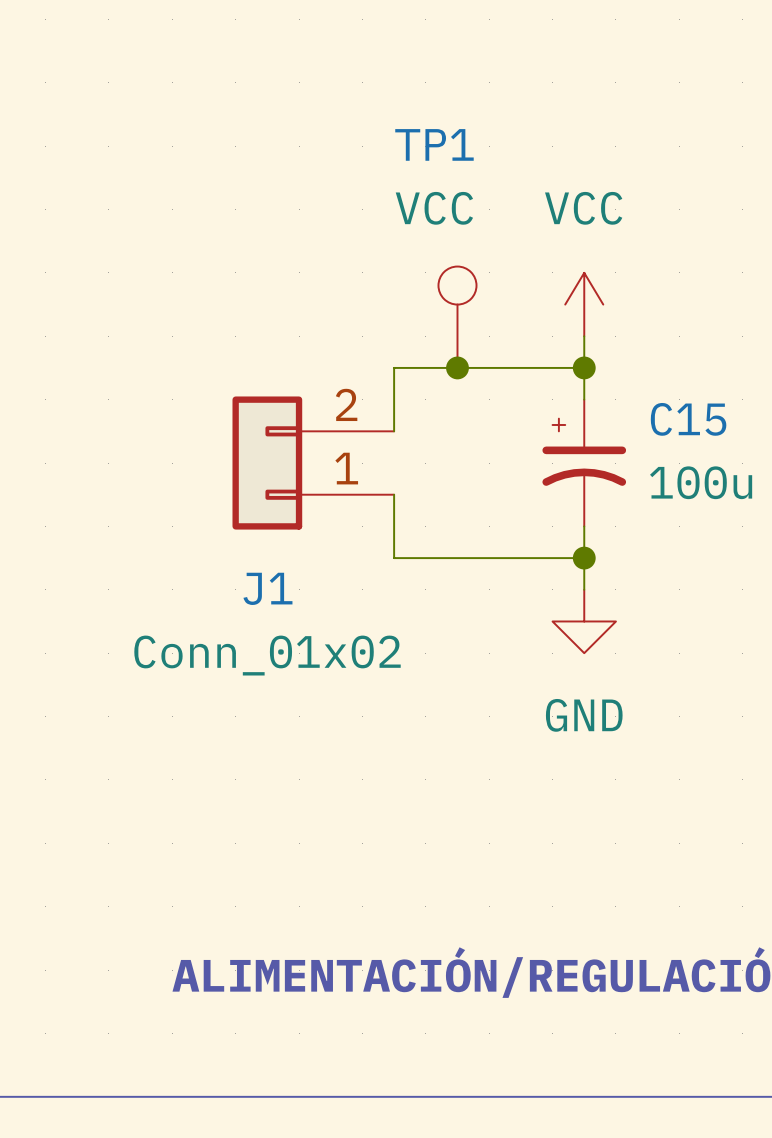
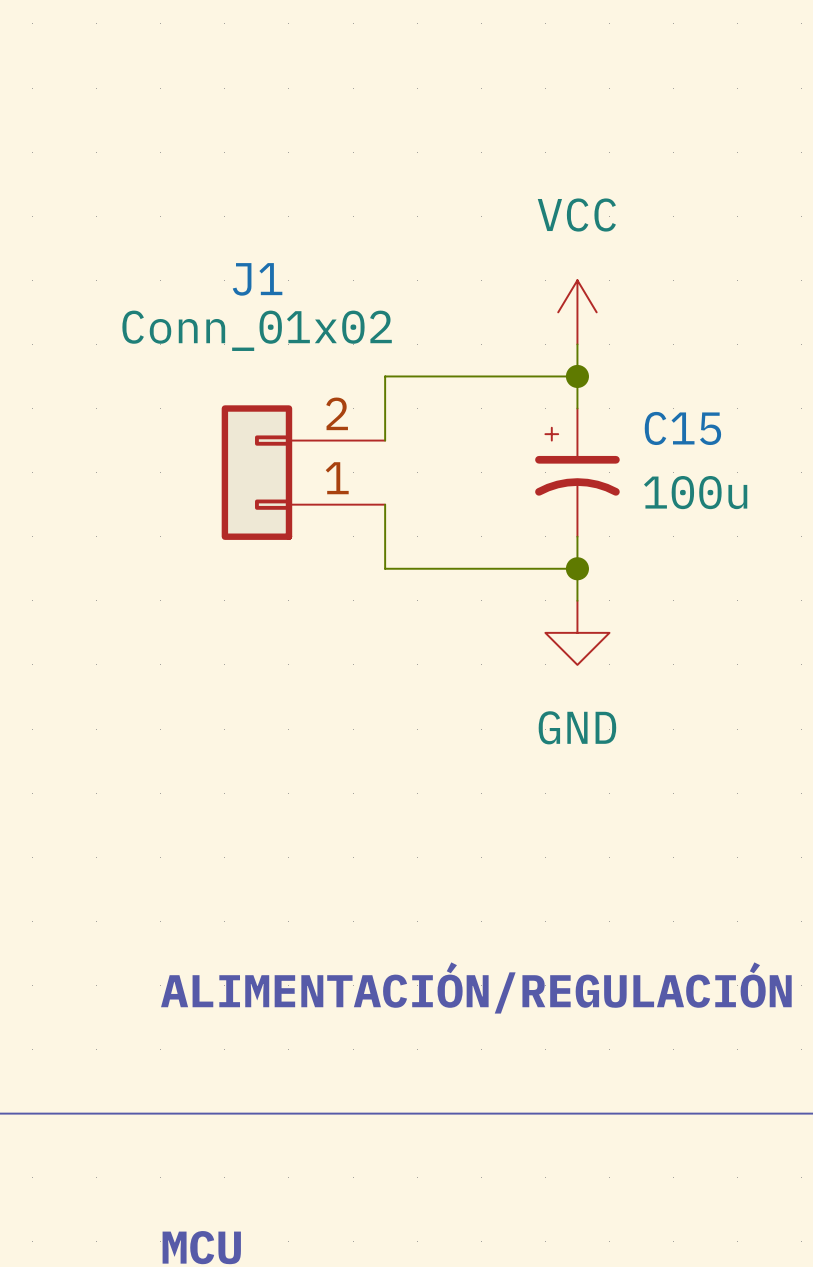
TP1: VCC (457, 317) -> none
junction: (457, 367) -> none
J1 name position: J1 (267, 588) -> J1 (257, 279)
J1 value position: Conn_01x02 (267, 655) -> Conn_01x02 (257, 330)

